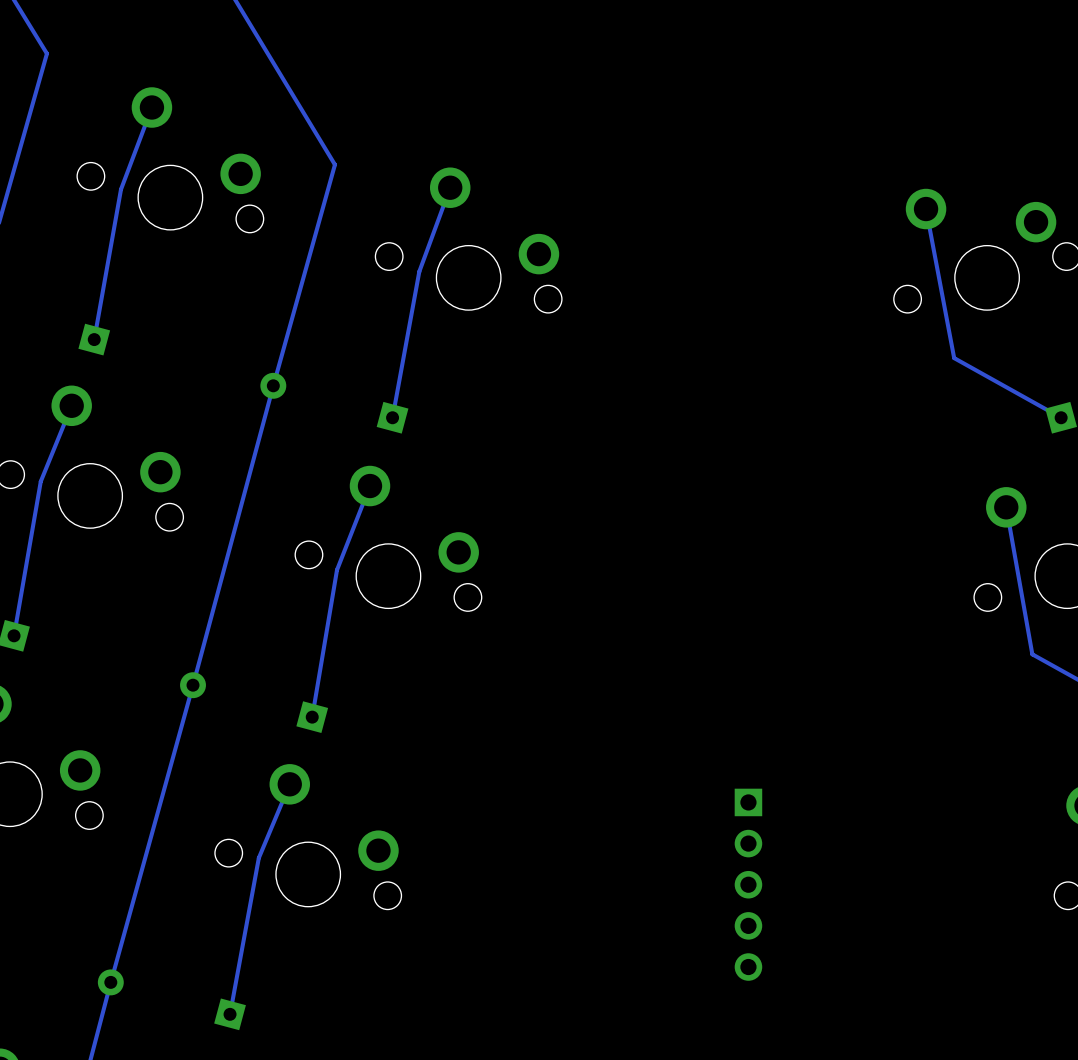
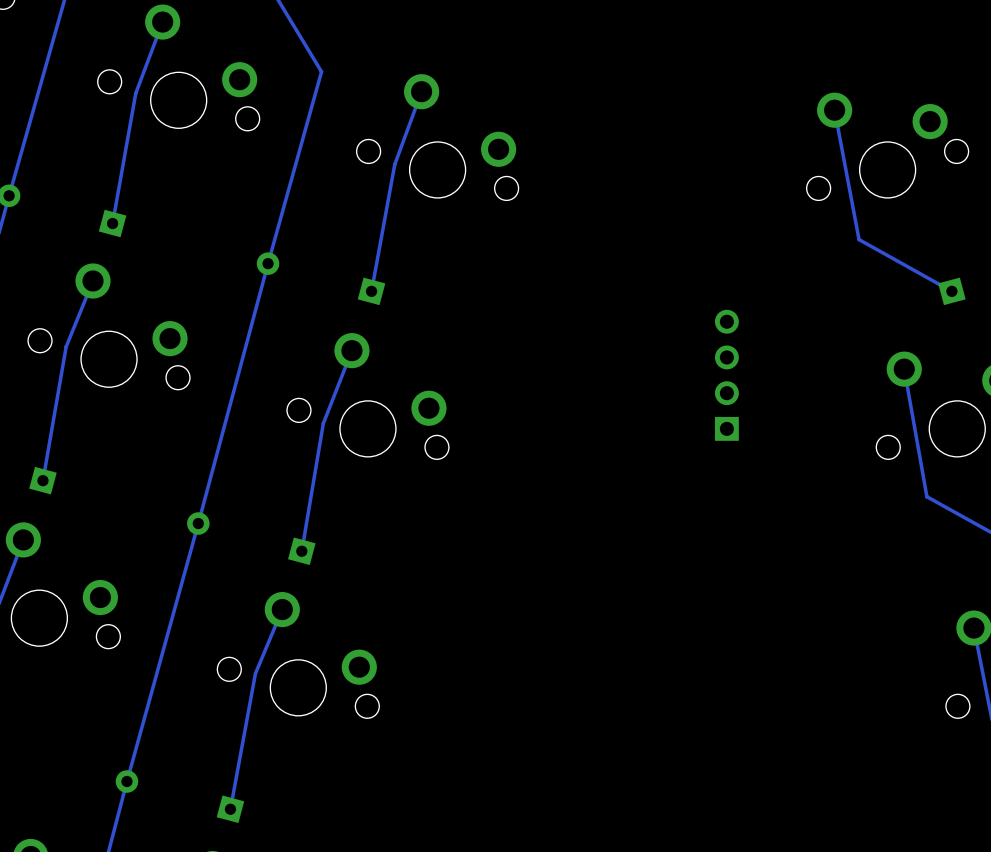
part: none -> (726, 375)
part: (748, 884) -> none

